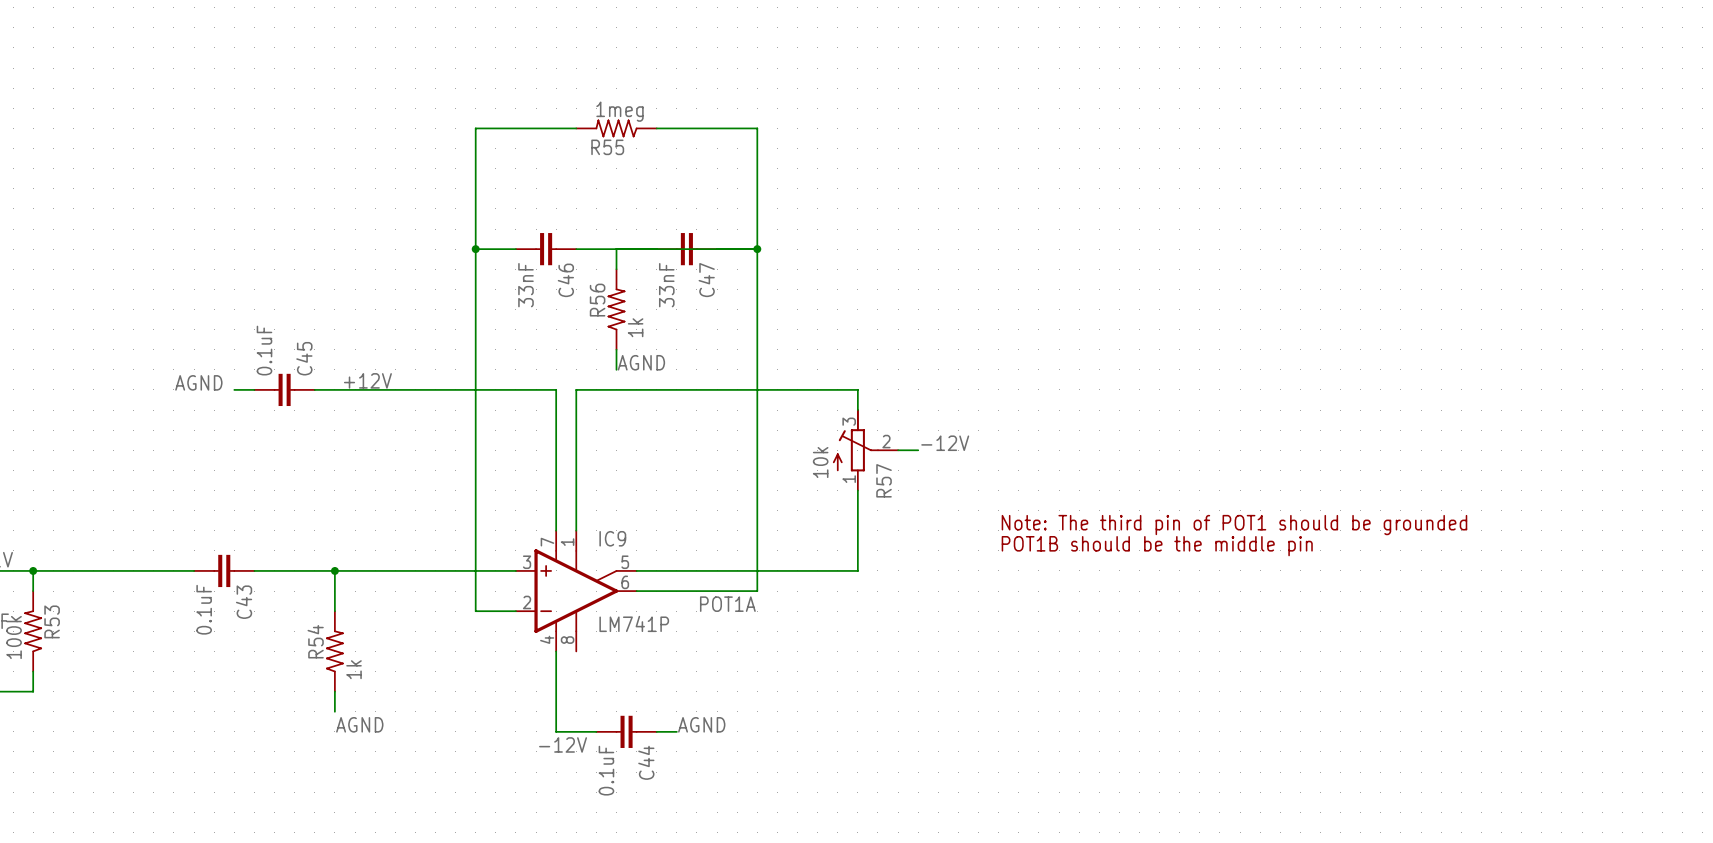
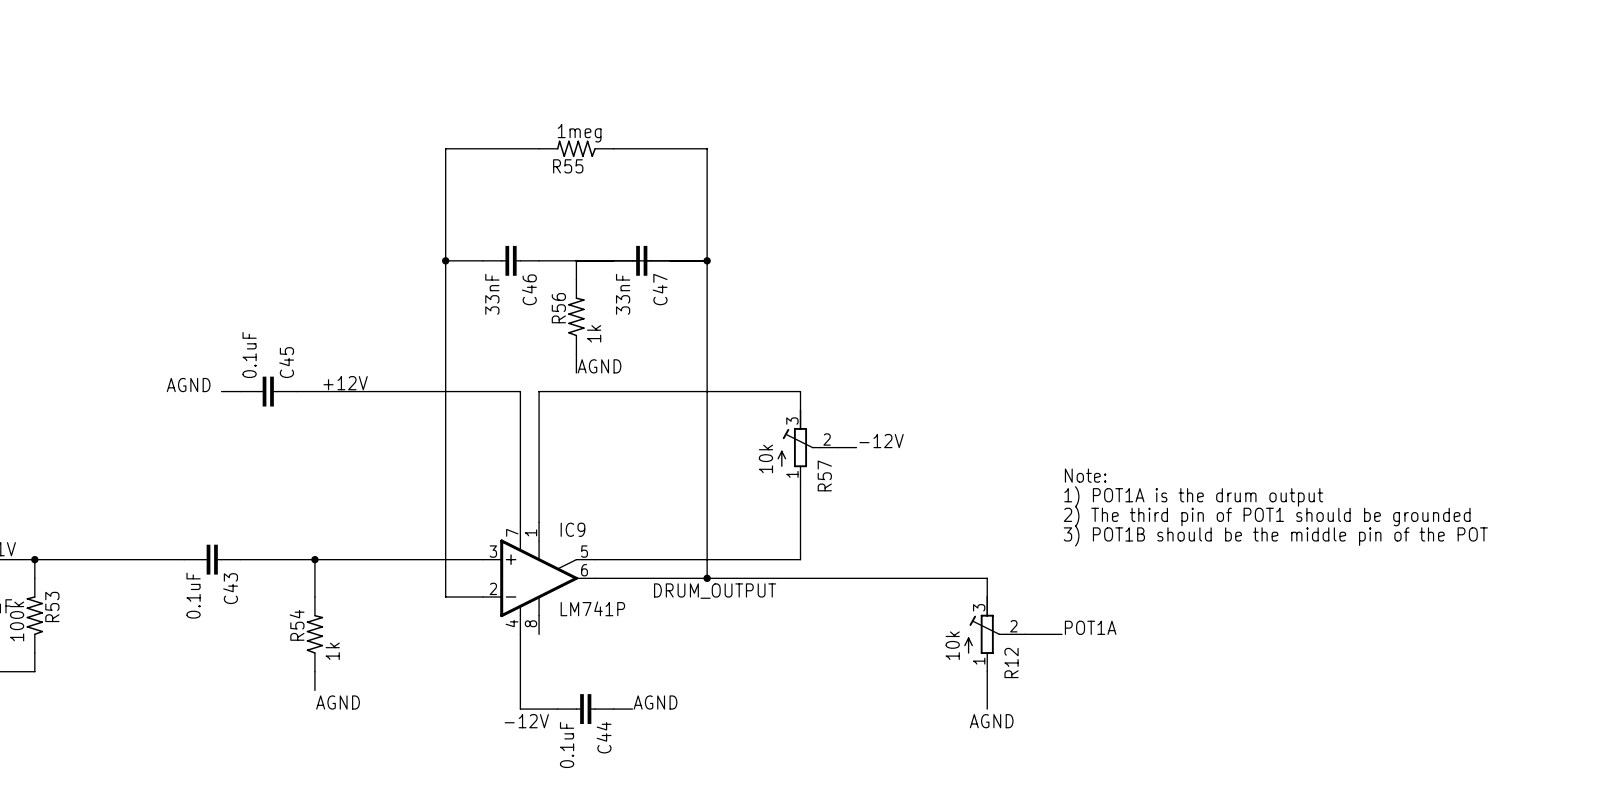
text: none -> Note: (1085, 475)
text: none -> 1) POT1A is the drum output (1193, 496)
text: Note: The third pin of POT1 should be grounded (1234, 525) -> 2) The third pin of POT1 should be grounded (1267, 516)
text: POT1B should be the middle pin (1157, 546) -> 3) POT1B should be the middle pin of the POT (1275, 535)
wire: none -> (707, 578) (987, 578) (987, 597)
junction: none -> (707, 578)
label: POT1A (727, 604) -> DRUM_OUTPUT (715, 591)
label: none -> POT1A (1090, 627)
R12: none -> 10k (994, 634)
wire: none -> (1024, 634) (1061, 634)
wire: none -> (987, 671) (987, 709)
label: none -> AGND (991, 721)

